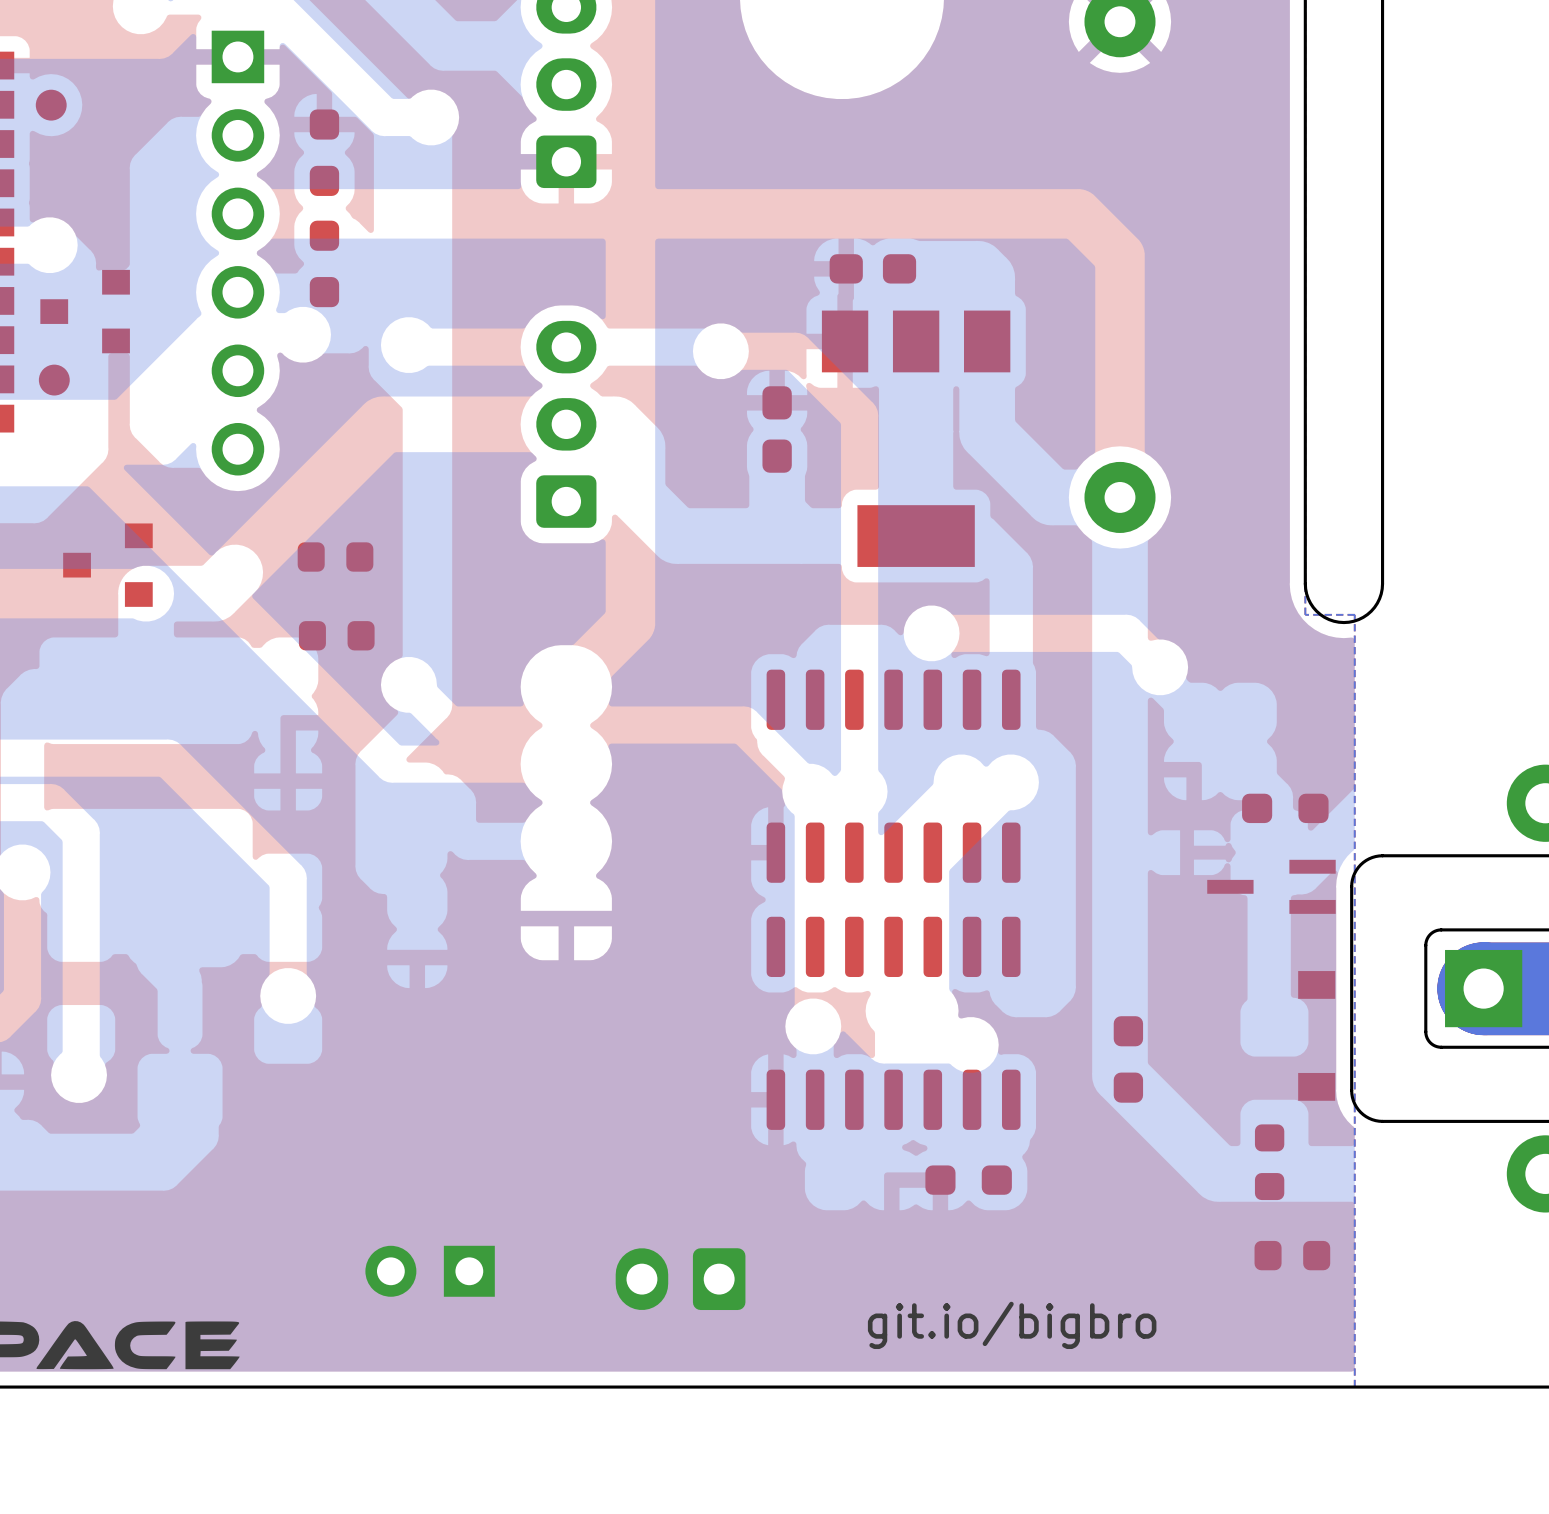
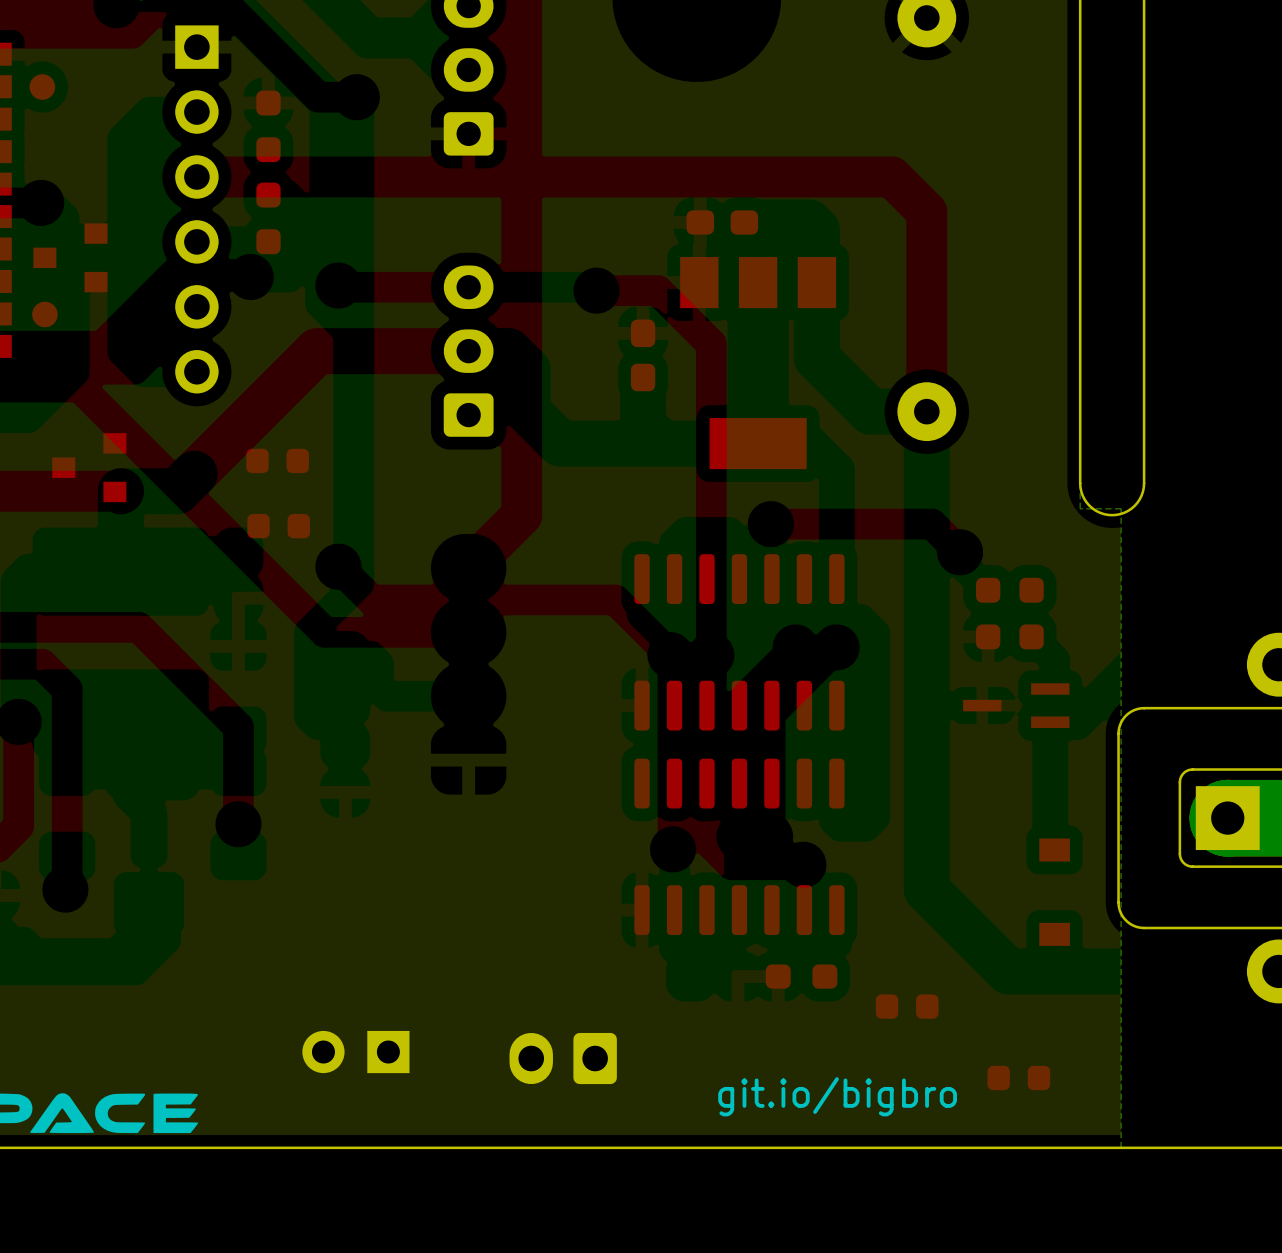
part: none -> (988, 613)
part: none -> (1031, 613)
part: (1285, 808) -> none
part position: (1271, 886) -> (1016, 705)
part position: (1316, 1035) -> (1054, 892)
part: (1128, 1059) -> none
part: (1269, 1162) -> none
part: none -> (907, 1006)
part: (1292, 1255) -> none
part: none -> (1018, 1077)

